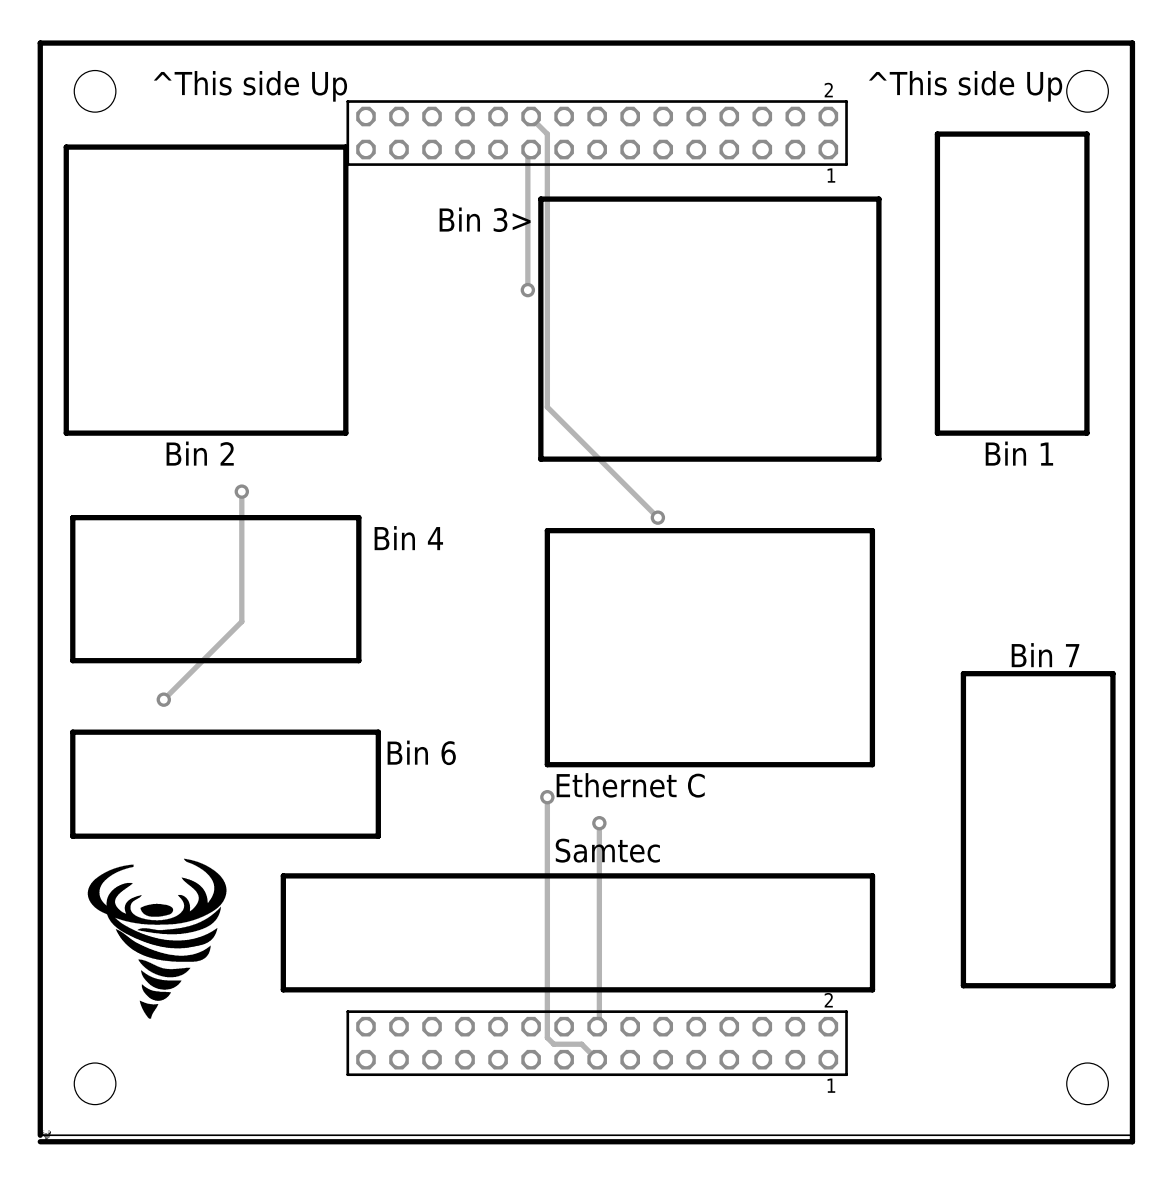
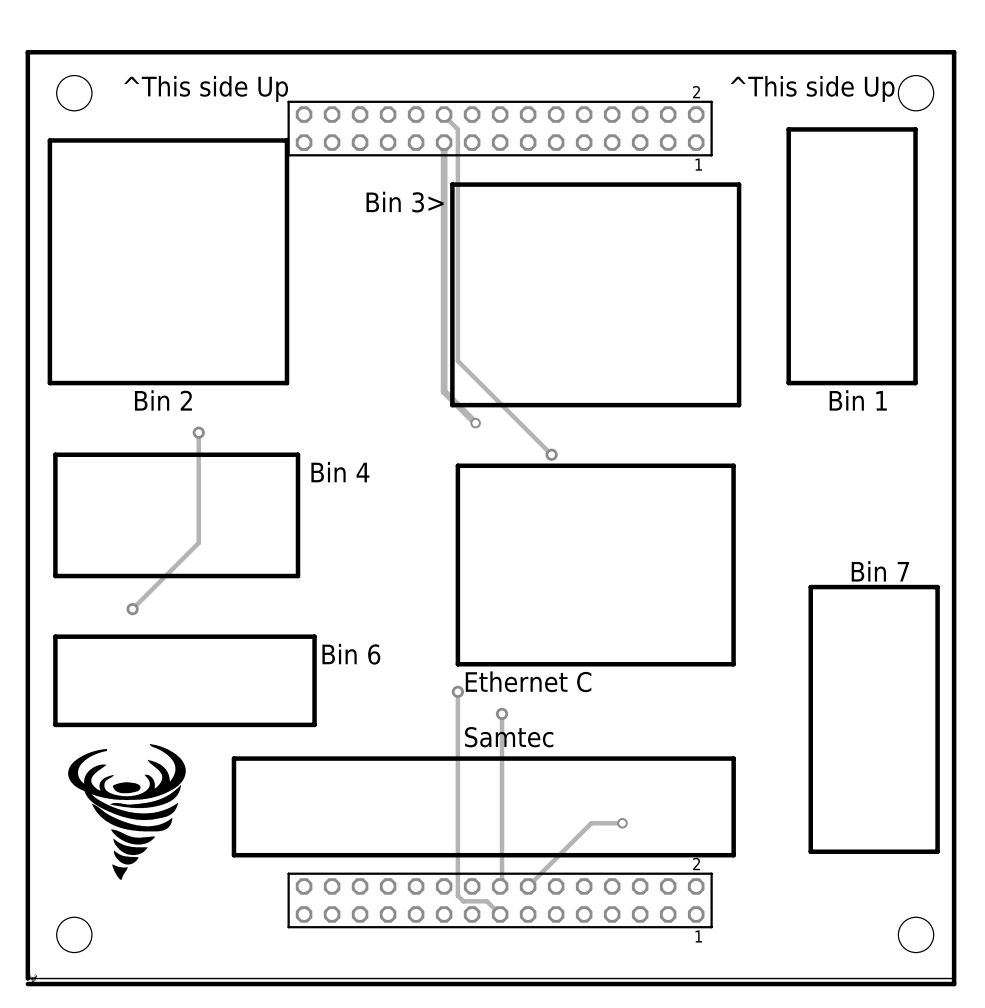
track: (531, 149) (527, 152) (527, 290) -> (444, 142) (444, 391) (475, 423)
via: (527, 290) -> none
via: none -> (475, 423)
track: none -> (622, 823) (591, 823) (528, 886)
via: none -> (622, 823)

